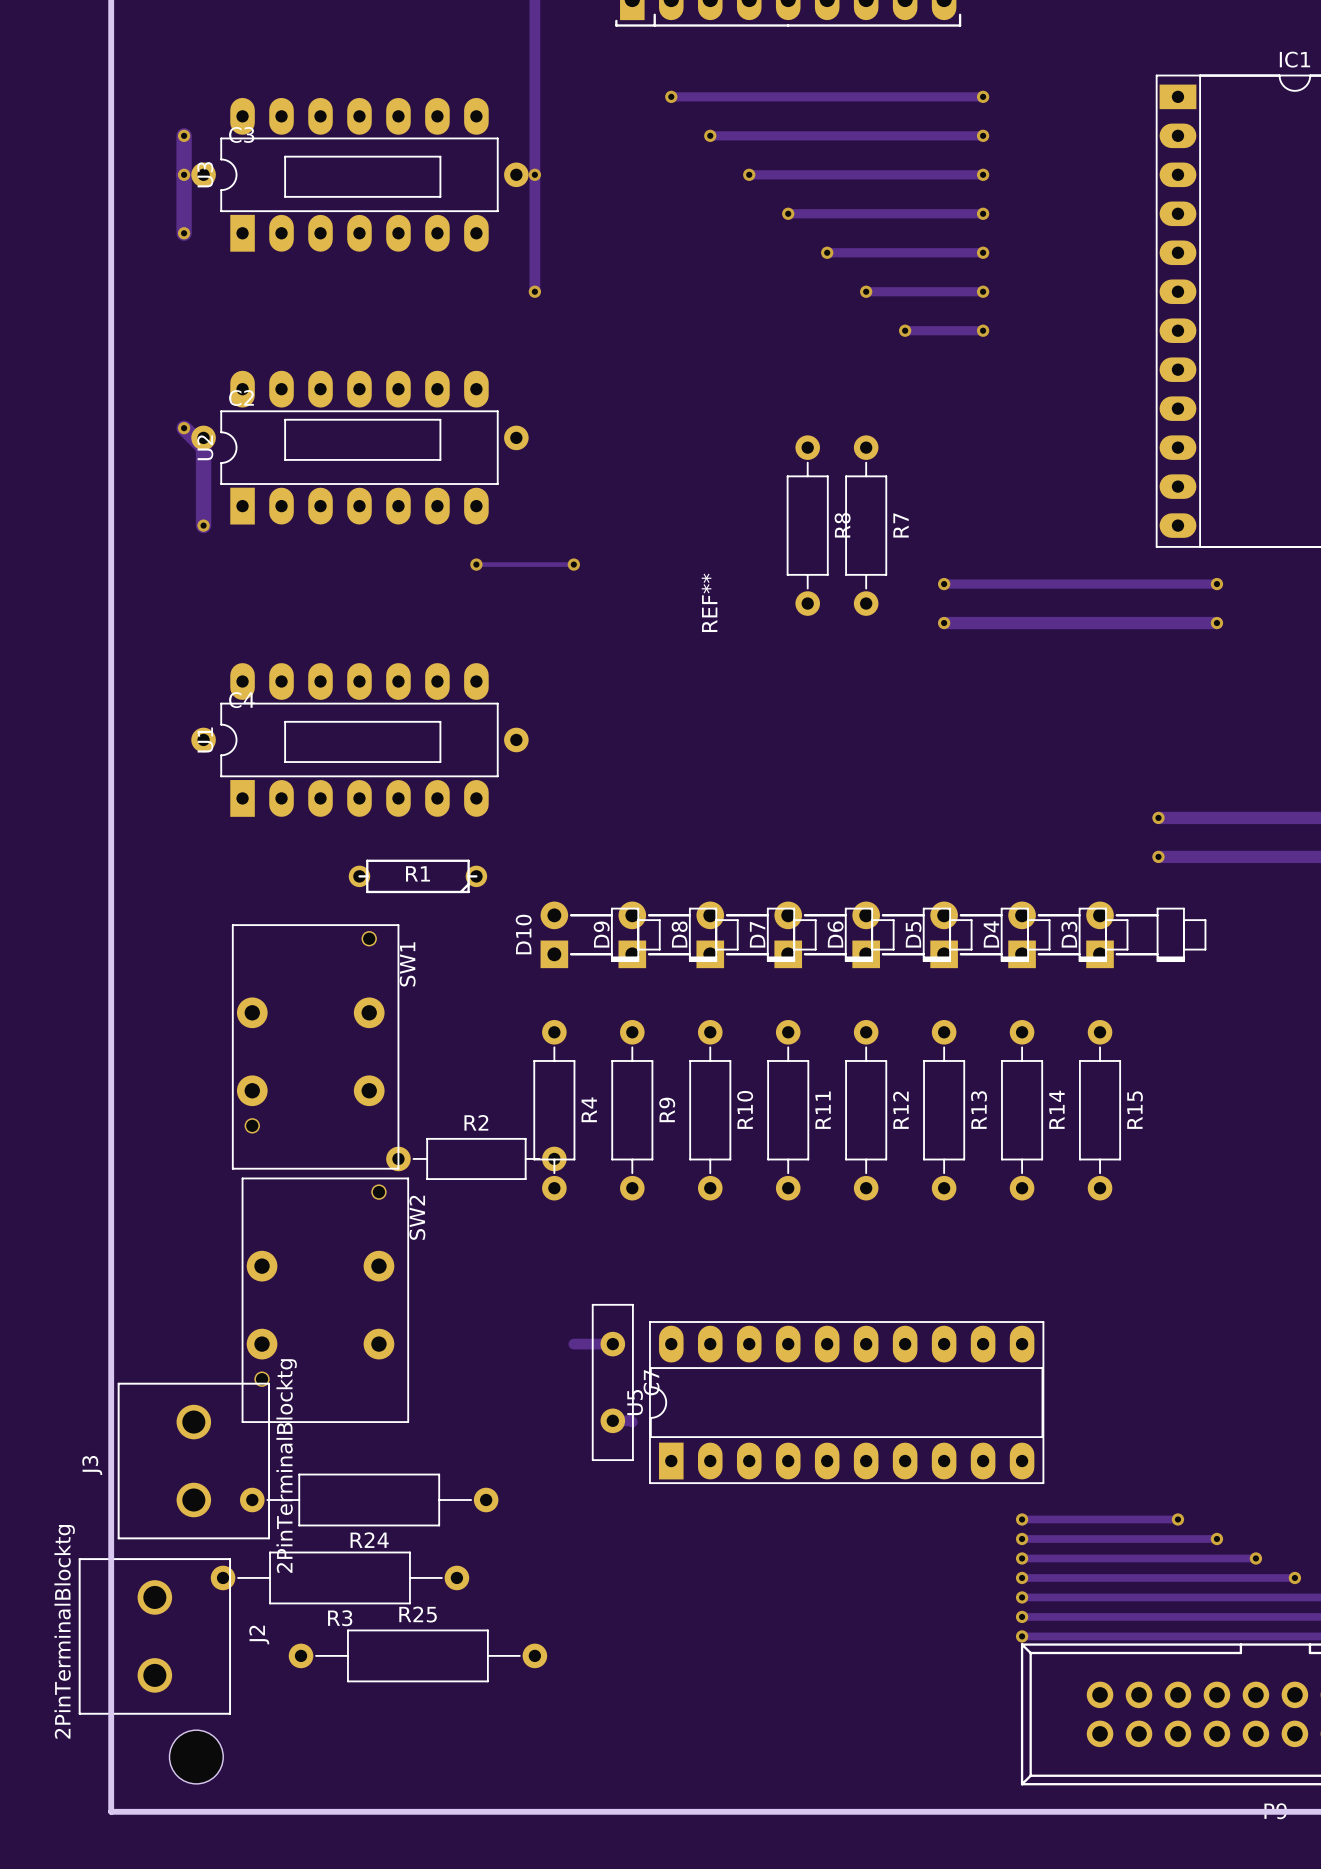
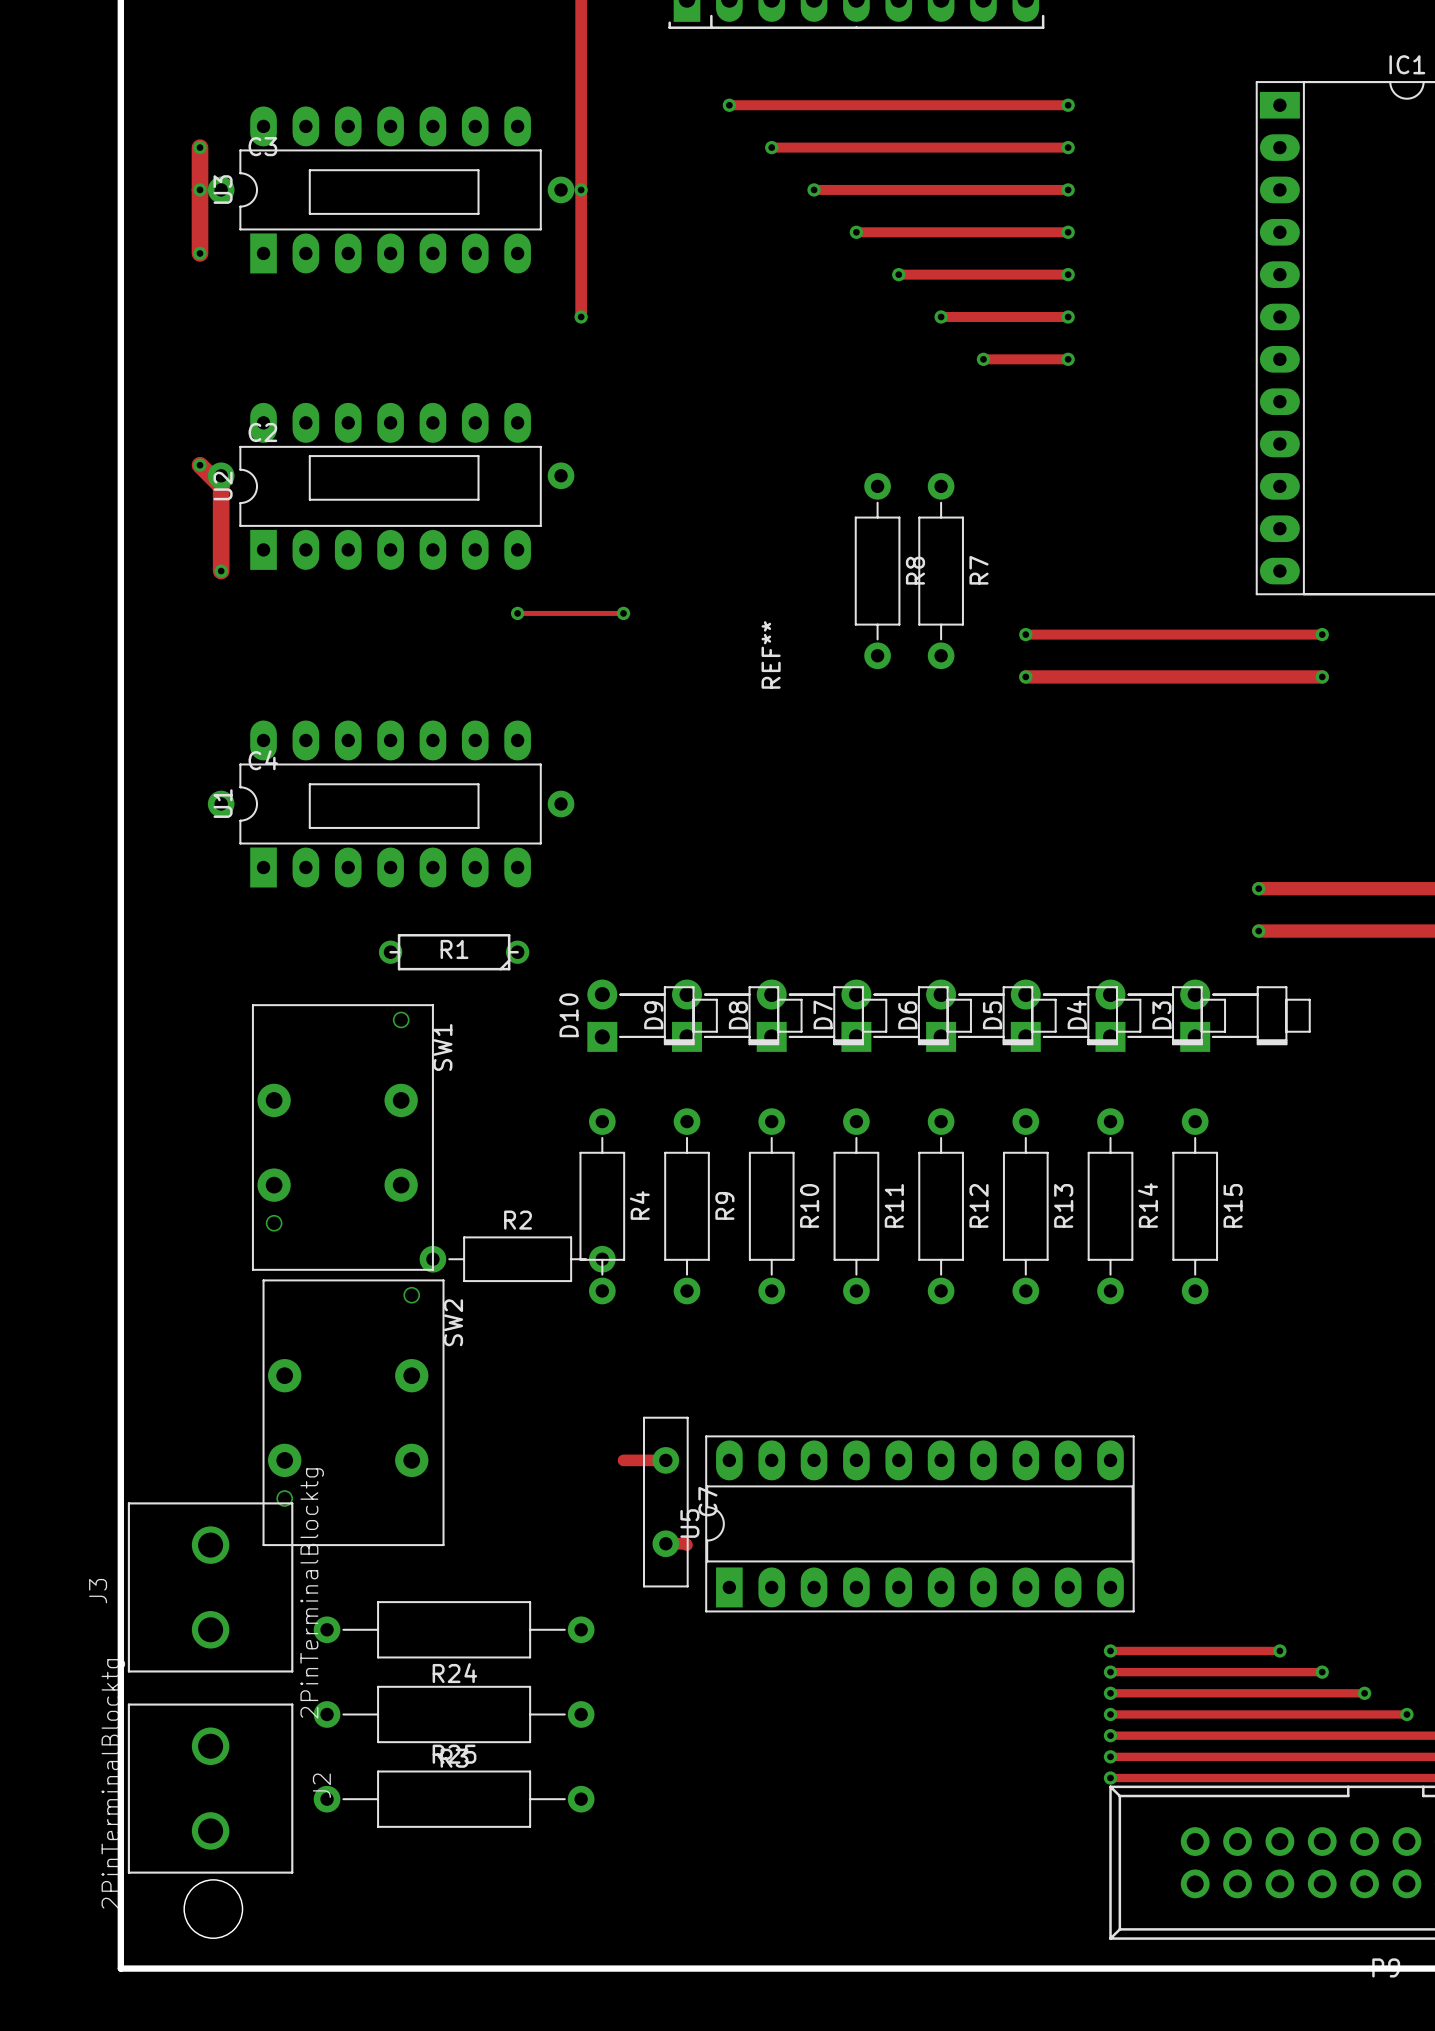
R24 position: (369, 1500) -> (454, 1629)
R3 position: (339, 1577) -> (454, 1714)
J2 position: (154, 1636) -> (210, 1788)

